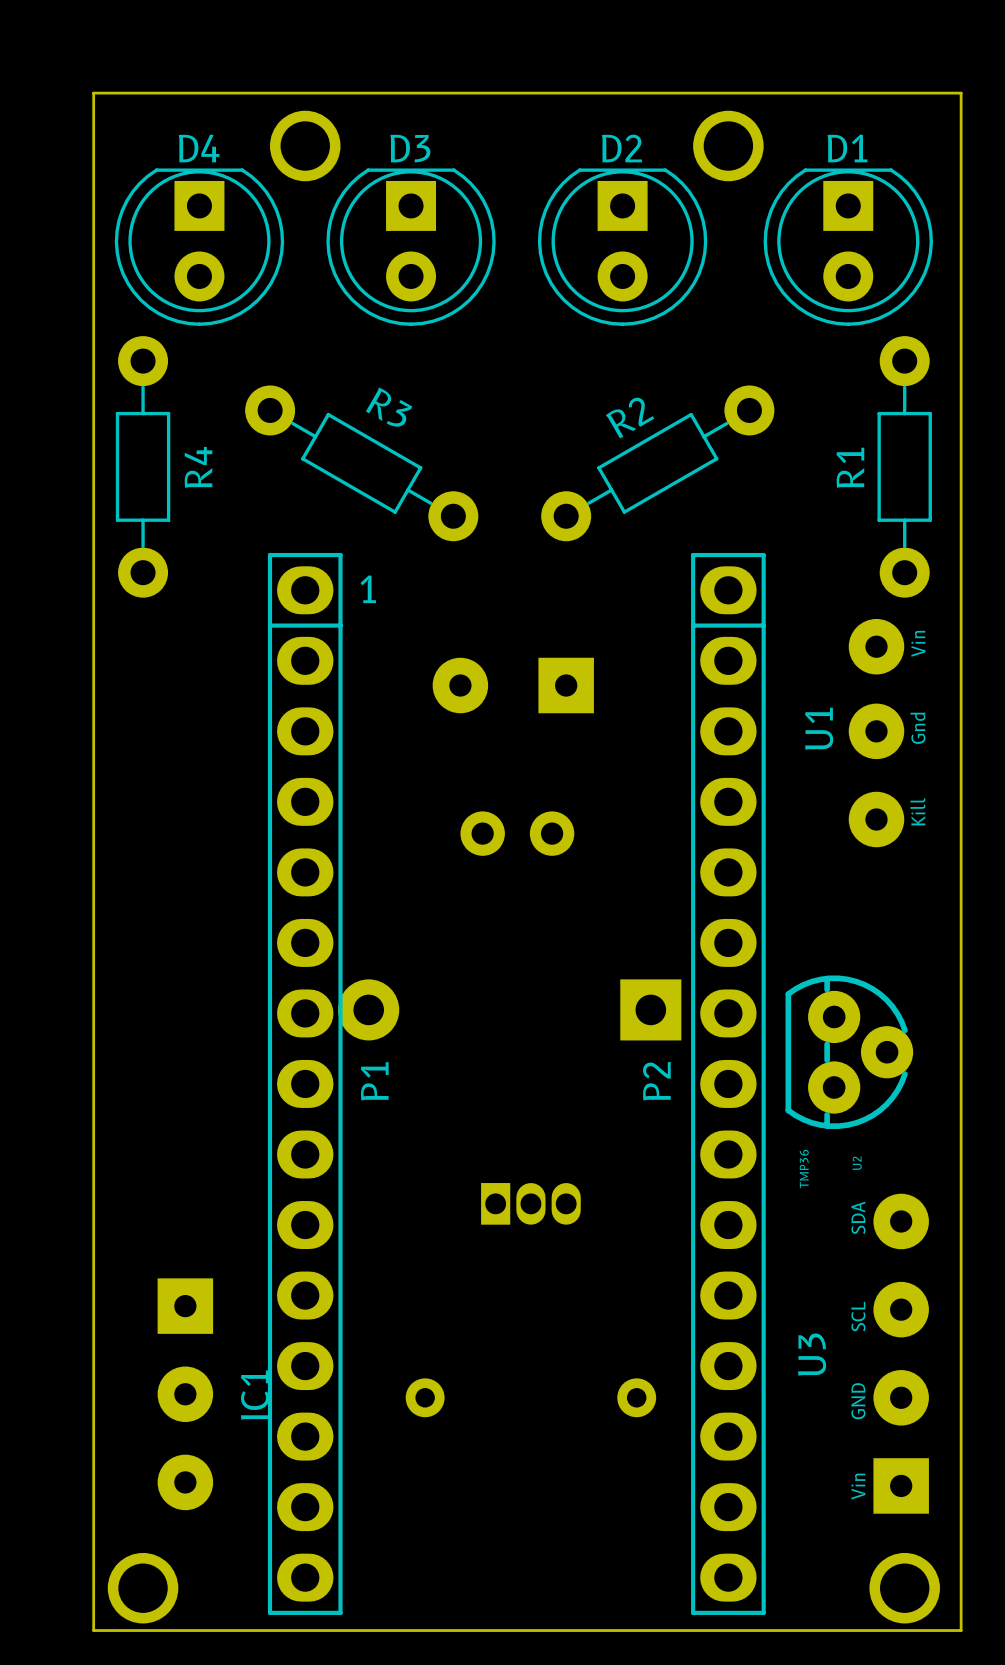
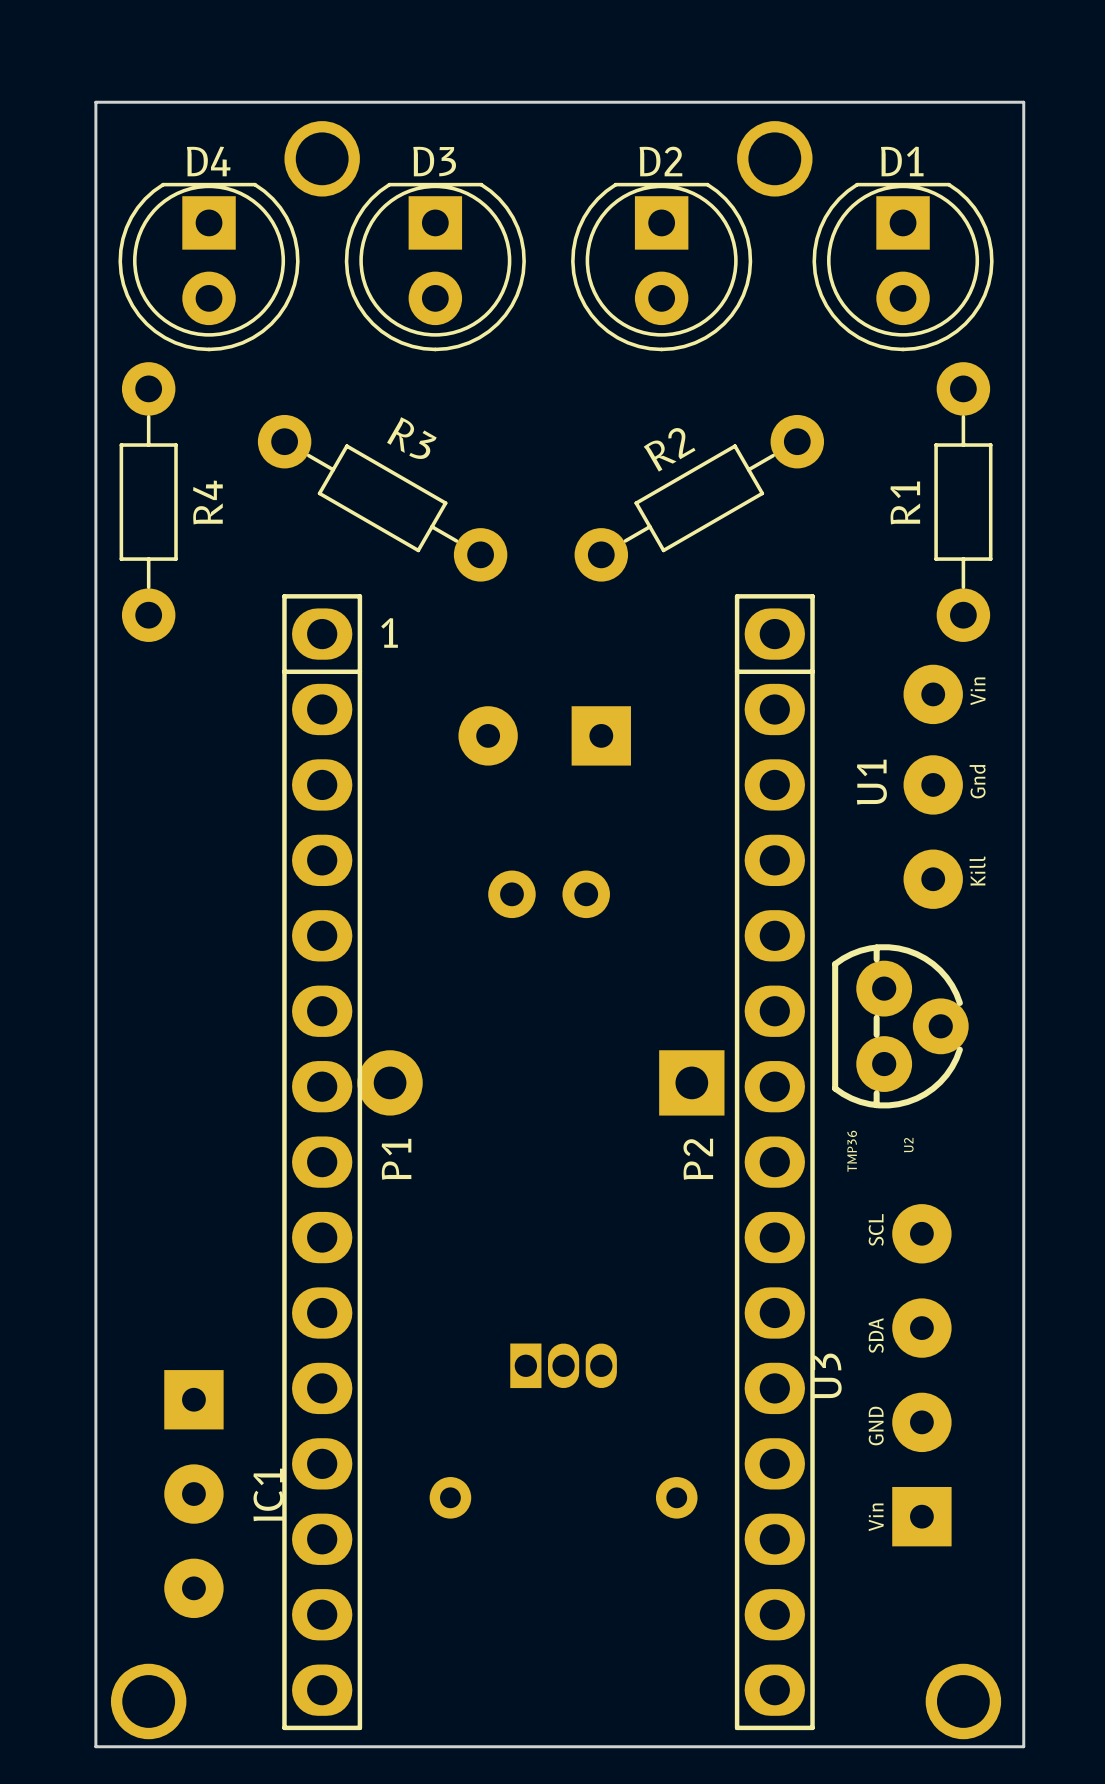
U2 position: (849, 1052) -> (900, 1026)
part position: (530, 1203) -> (563, 1365)
U3 text: SDA (858, 1217) -> SCL (876, 1229)
U3 text: SCL (858, 1316) -> SDA (876, 1335)
U3 position: (901, 1353) -> (921, 1375)

